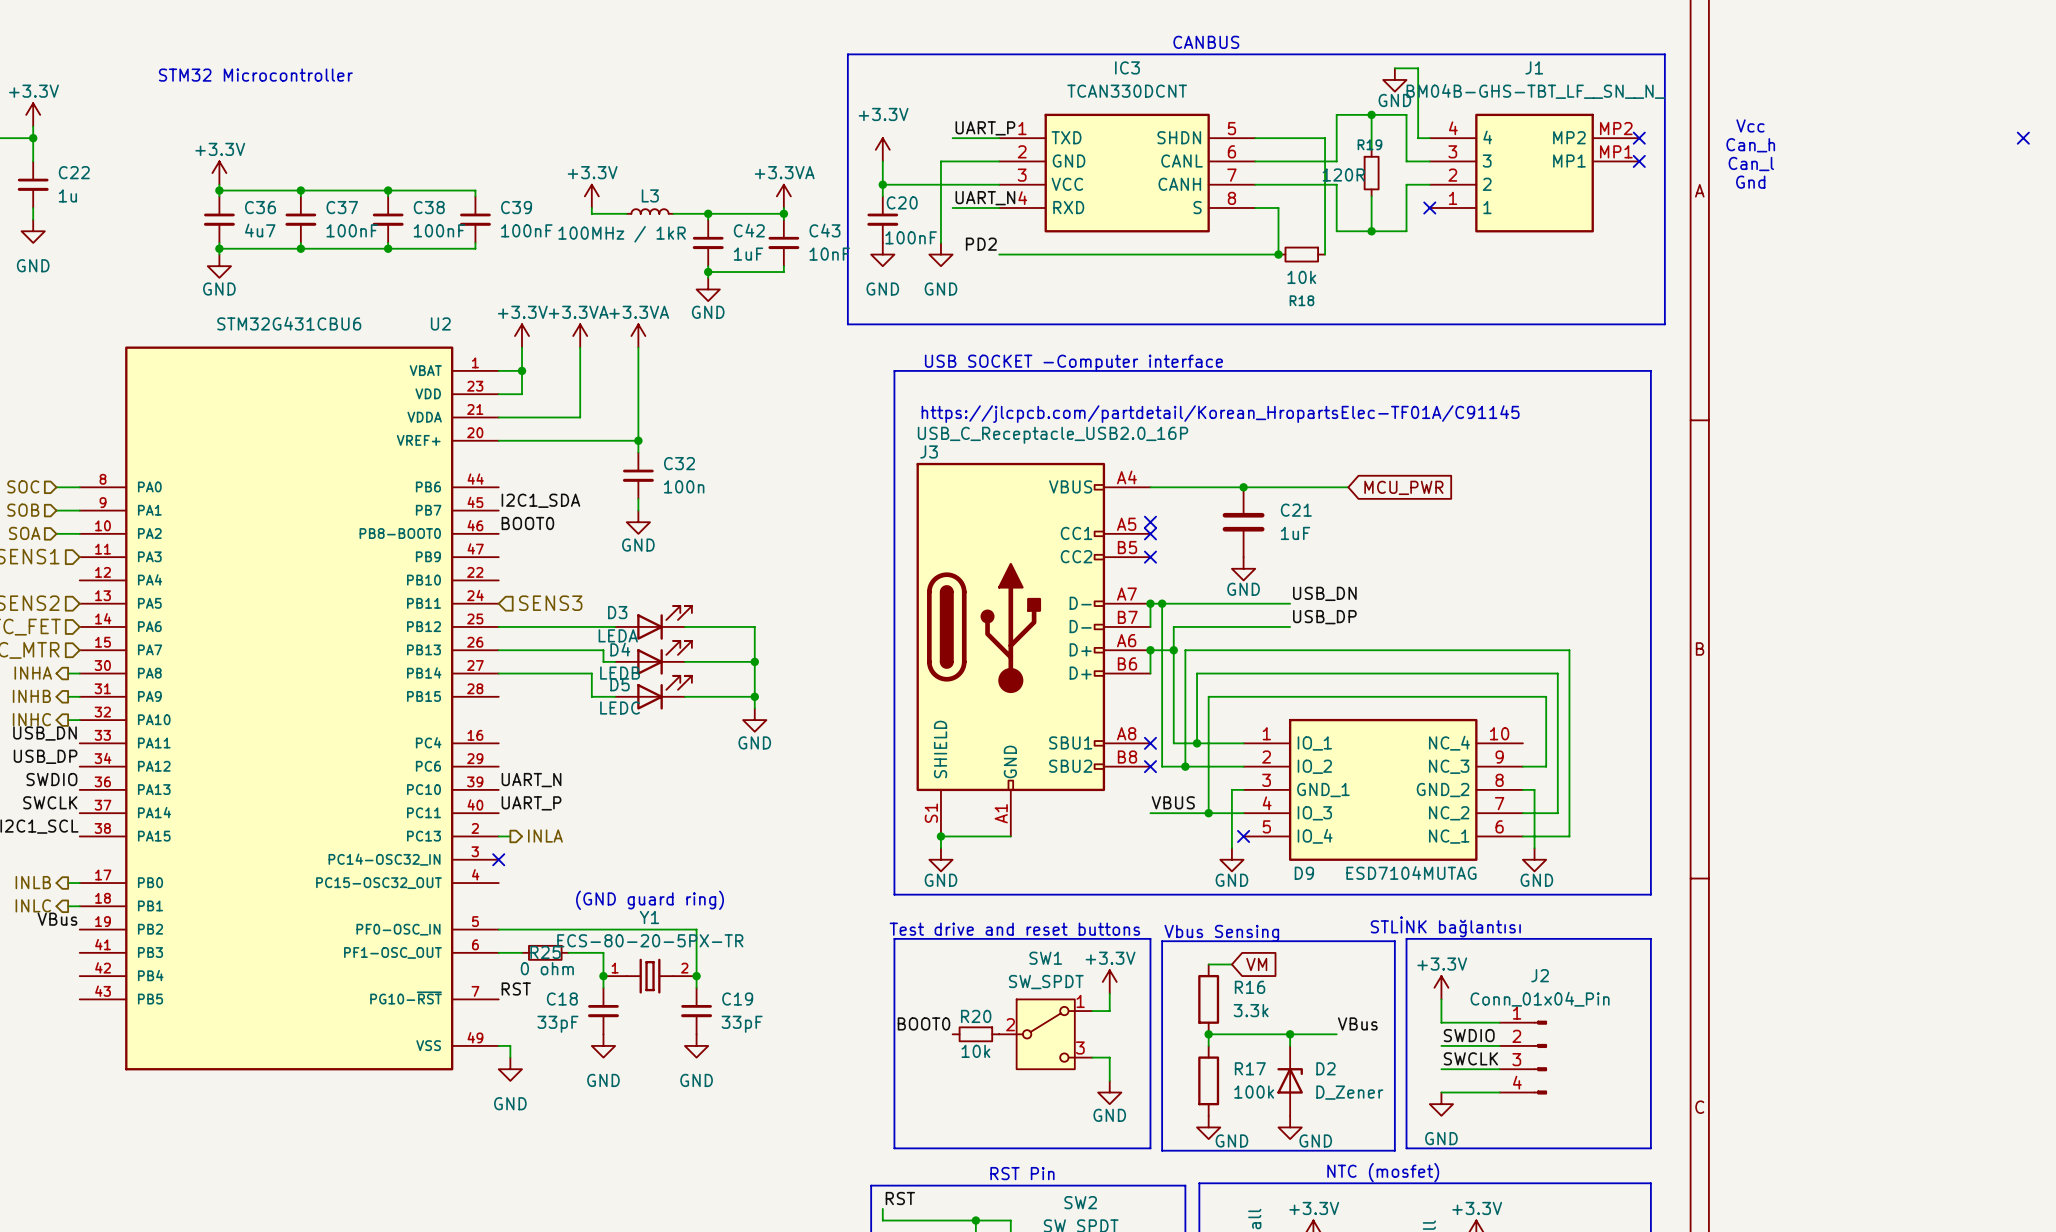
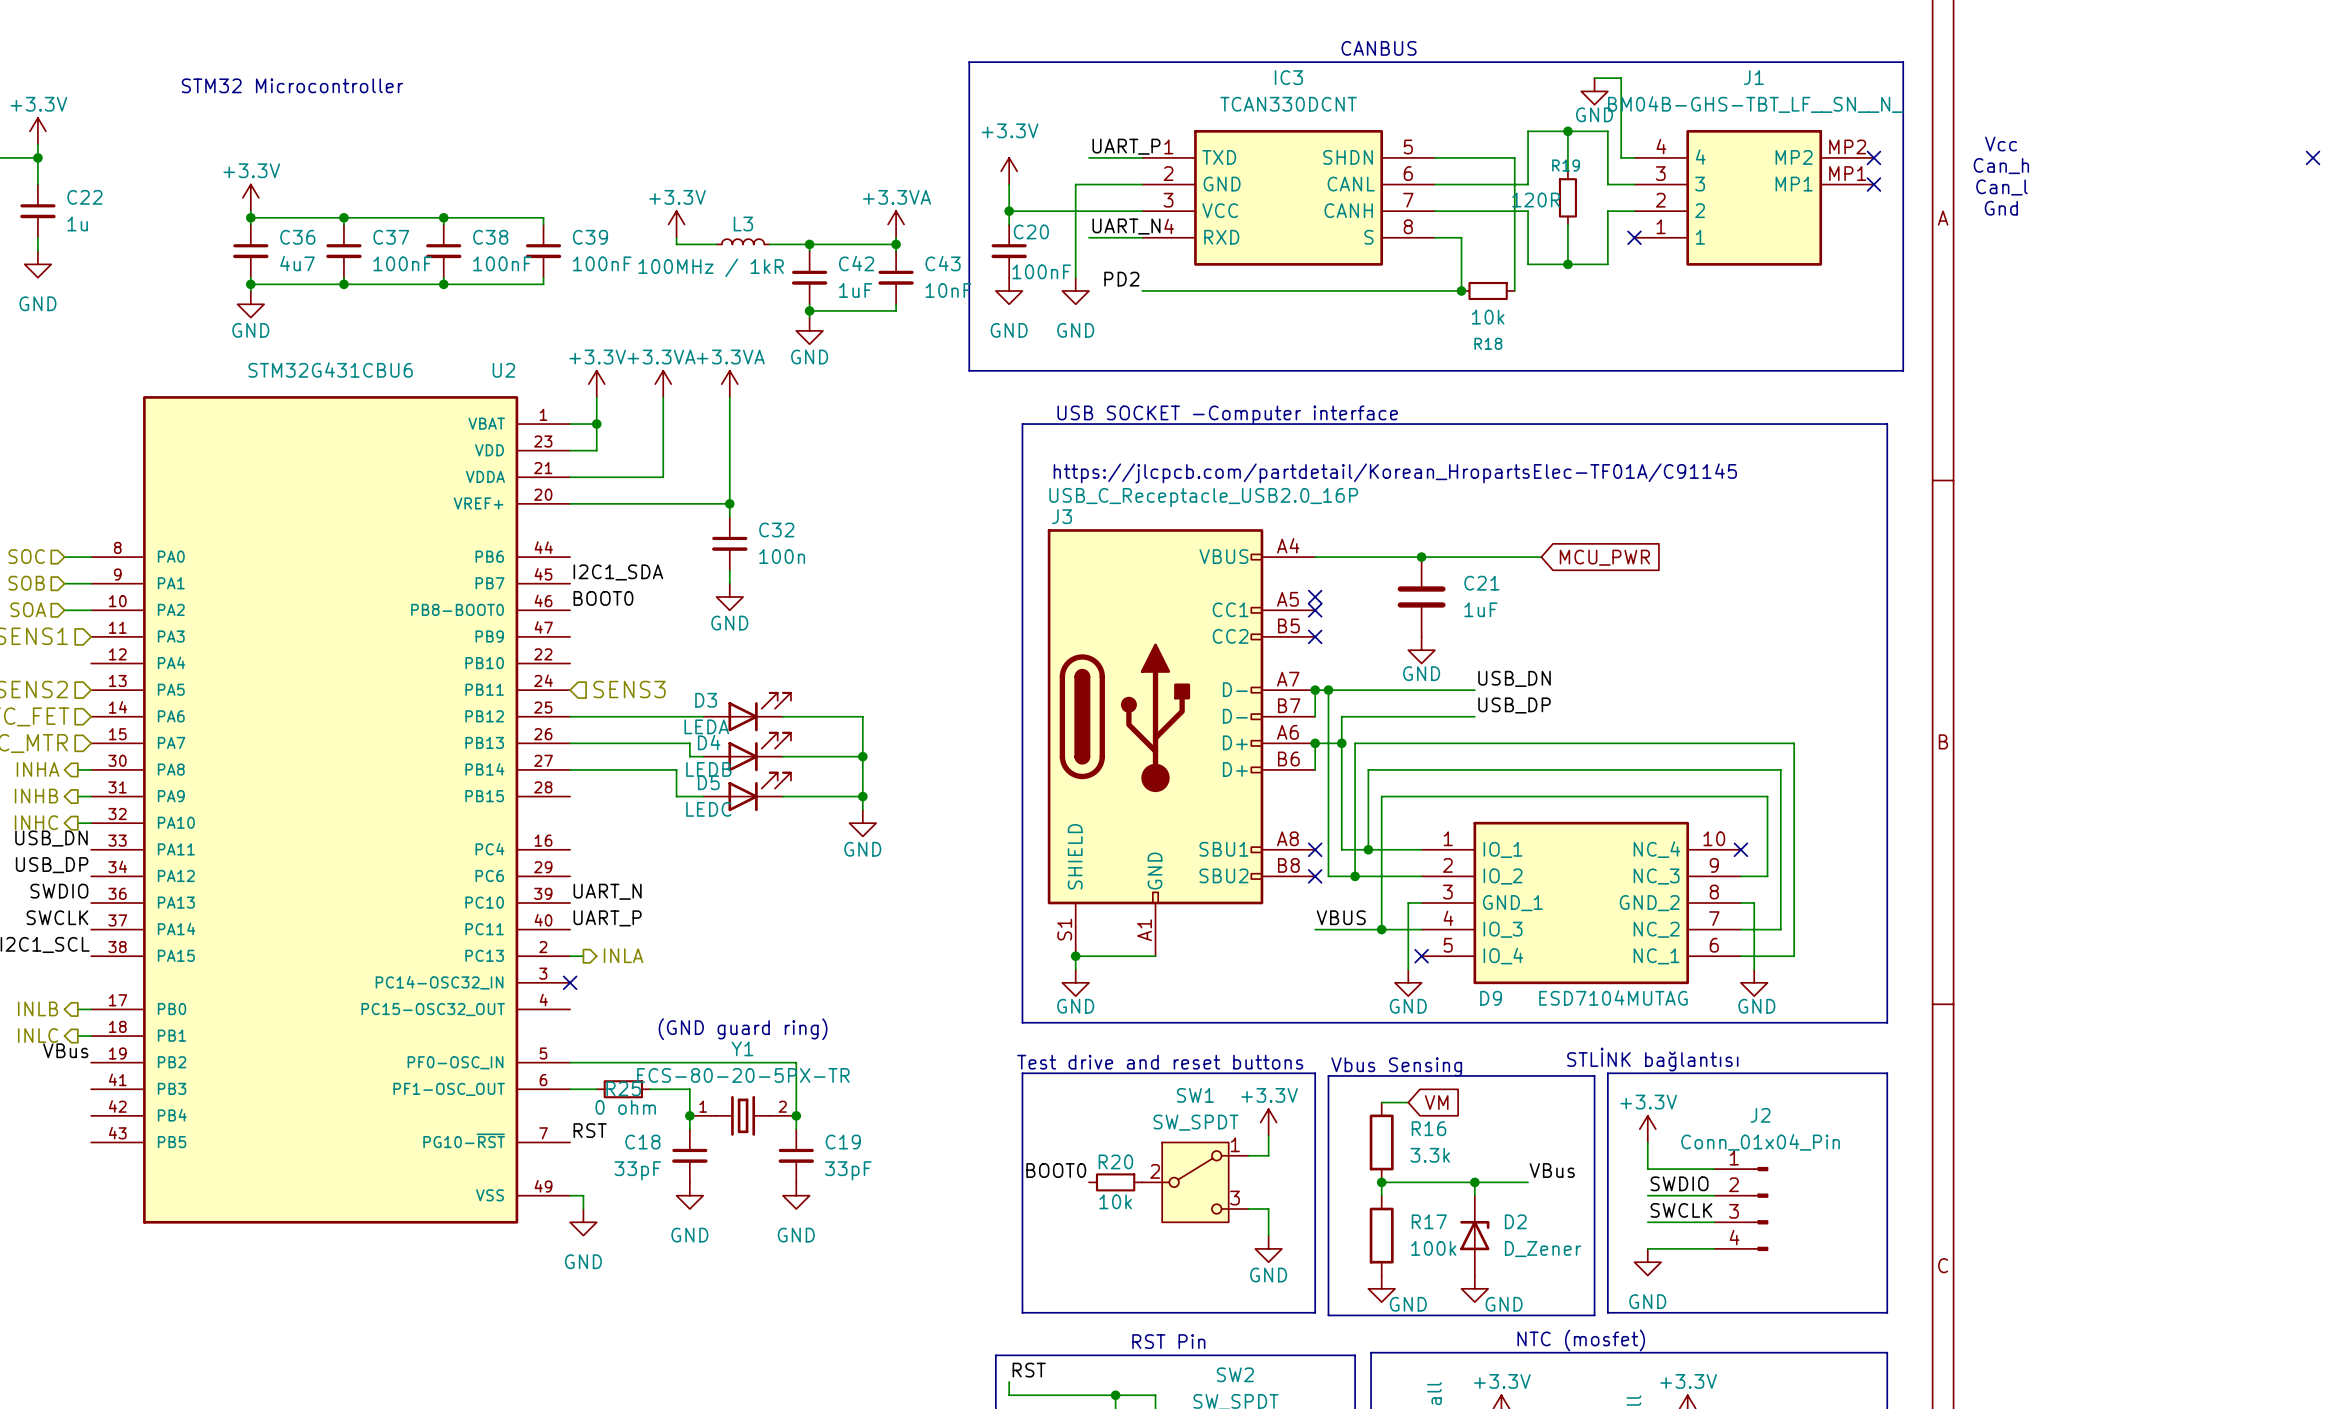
no-connect mark: none -> (1740, 849)

